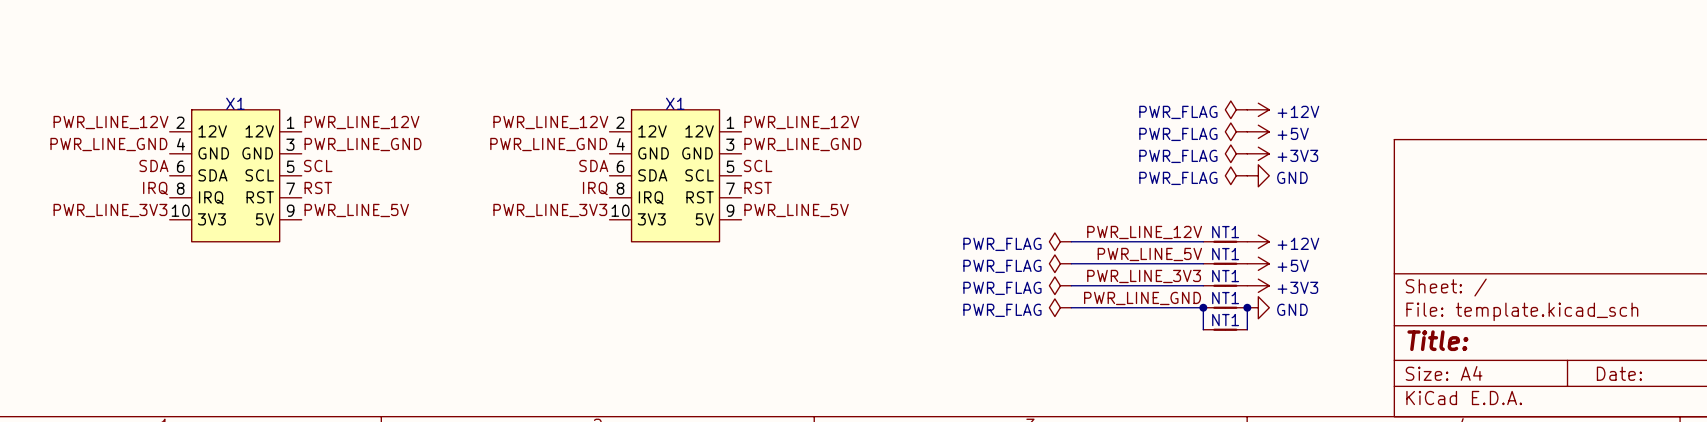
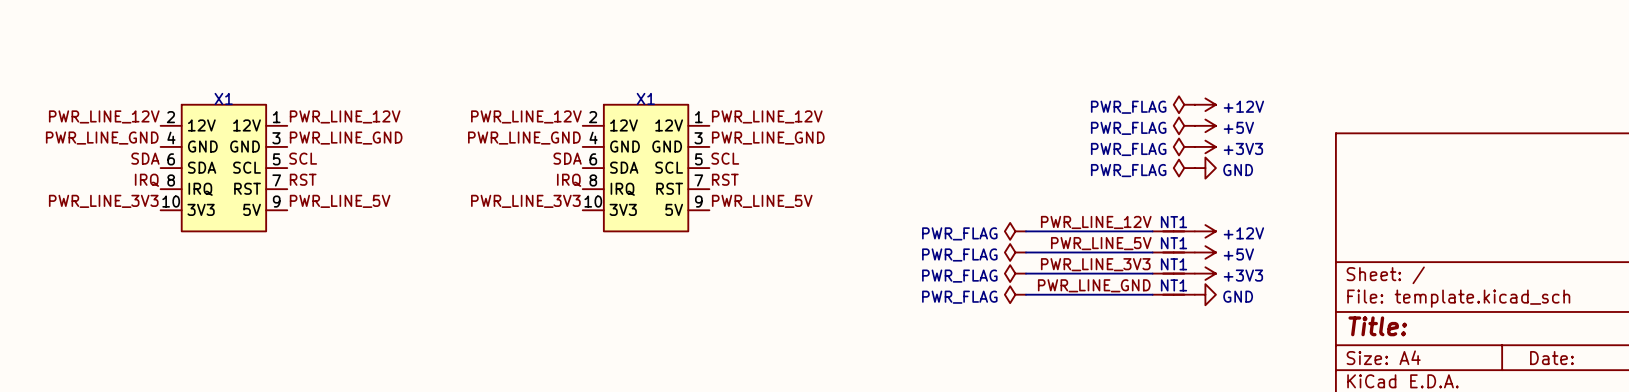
wire: (1203, 307) (1203, 329) -> none
junction: (1203, 307) -> none
wire: (1247, 307) (1247, 329) -> none
junction: (1247, 307) -> none
NT1: (1225, 329) -> none

